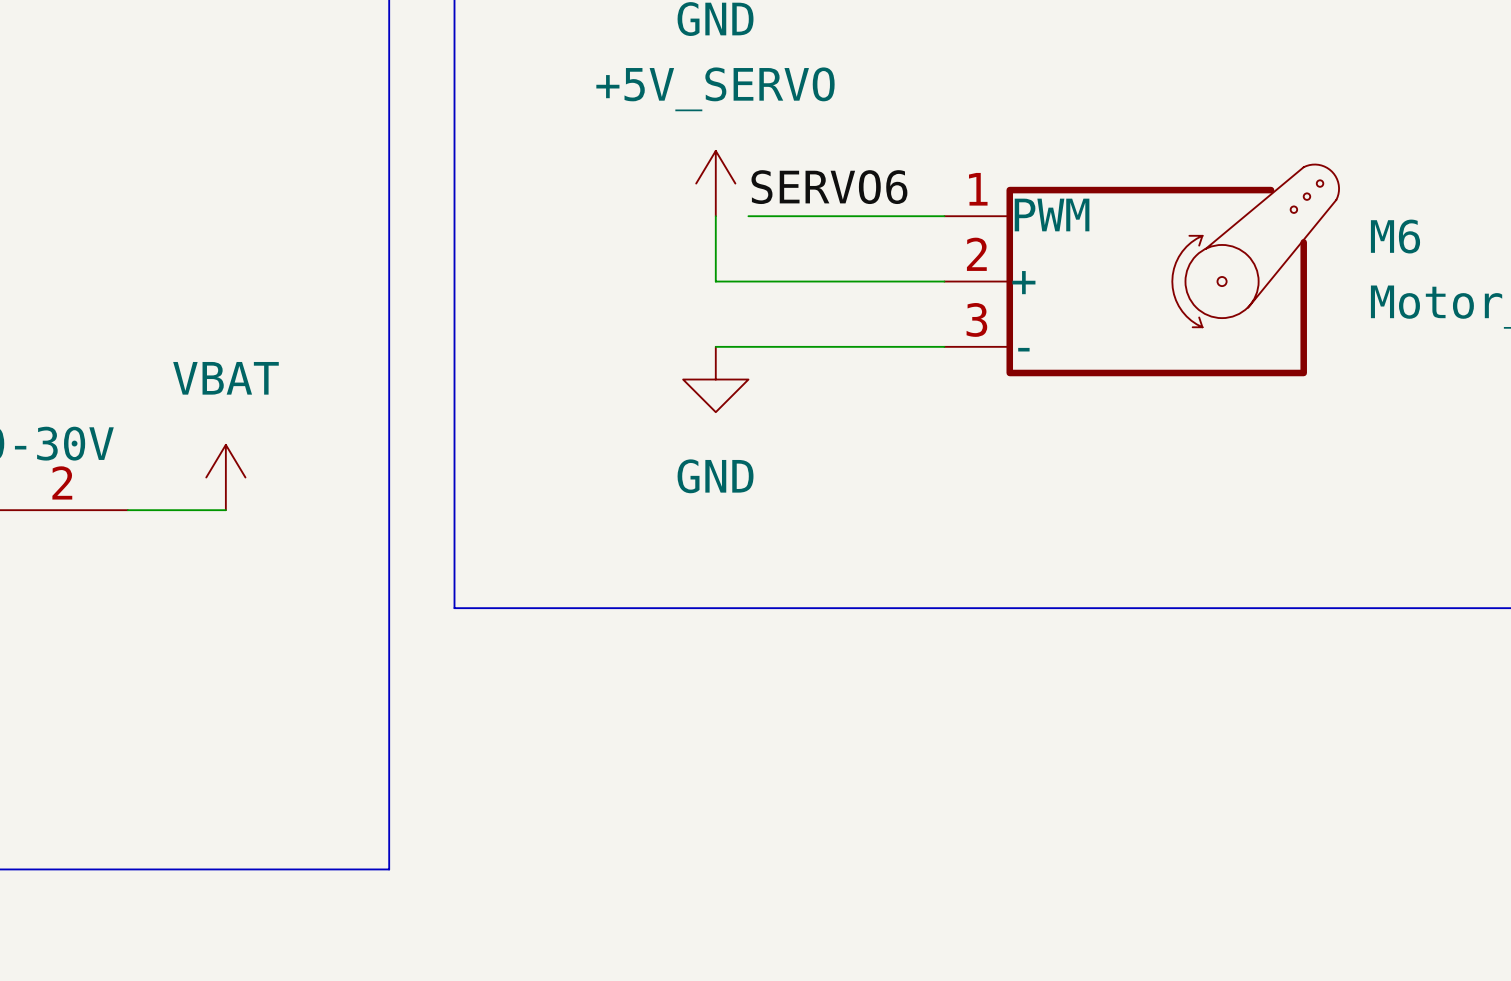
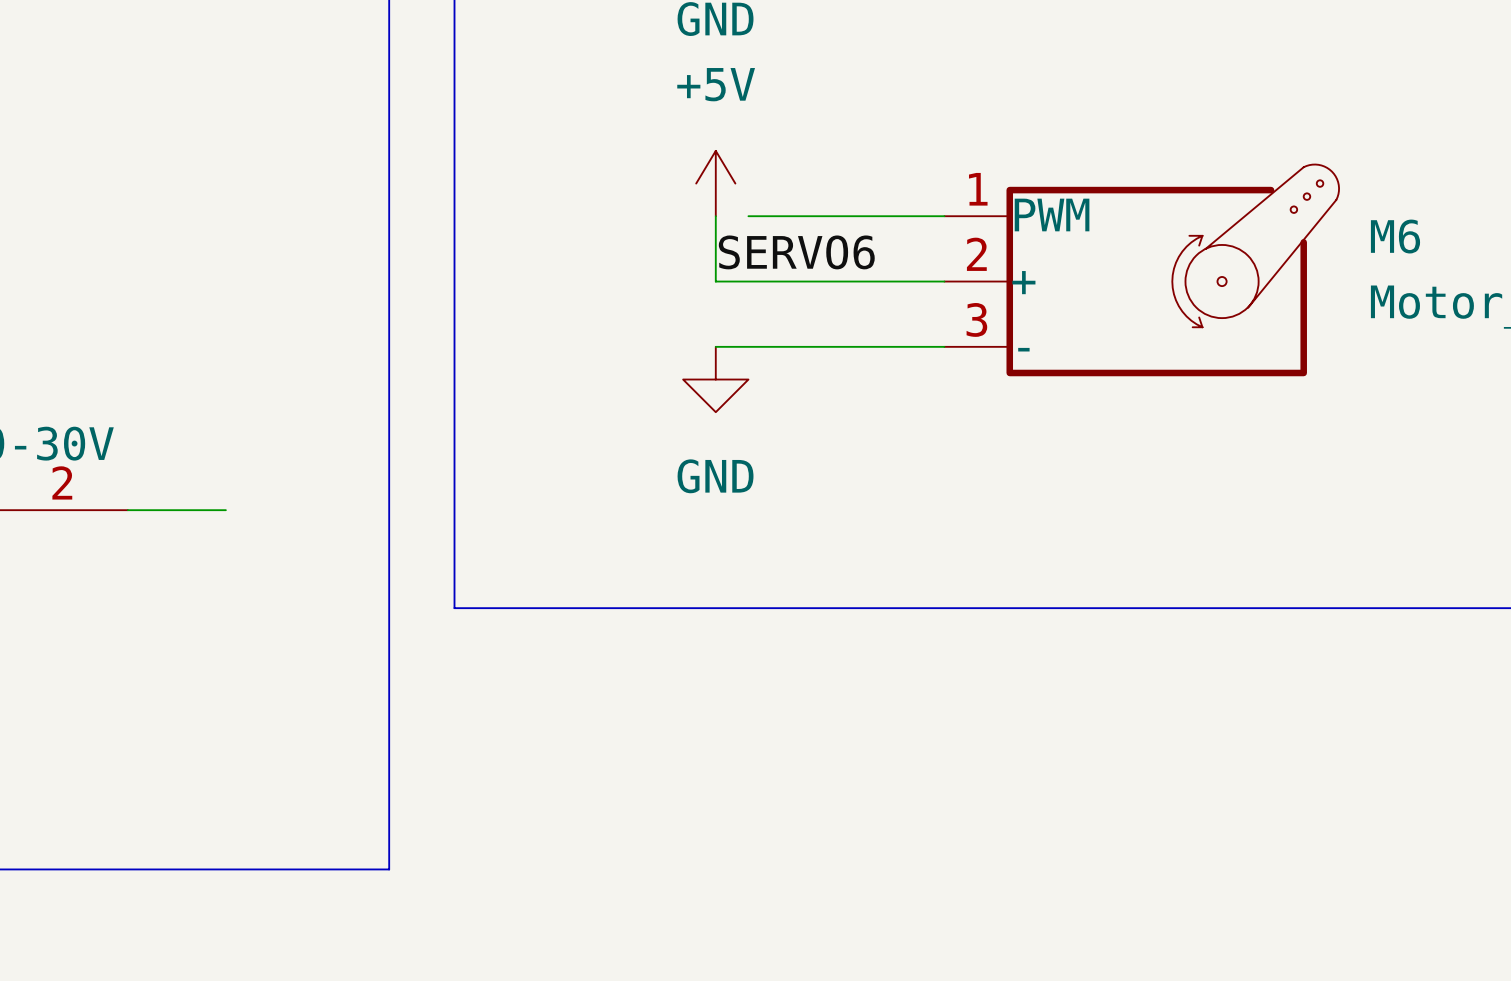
power symbol: +5V_SERVO (715, 183) -> +5V (715, 183)
label position: SERVO6 (829, 187) -> SERVO6 (796, 252)
power symbol: VBAT (225, 477) -> none

